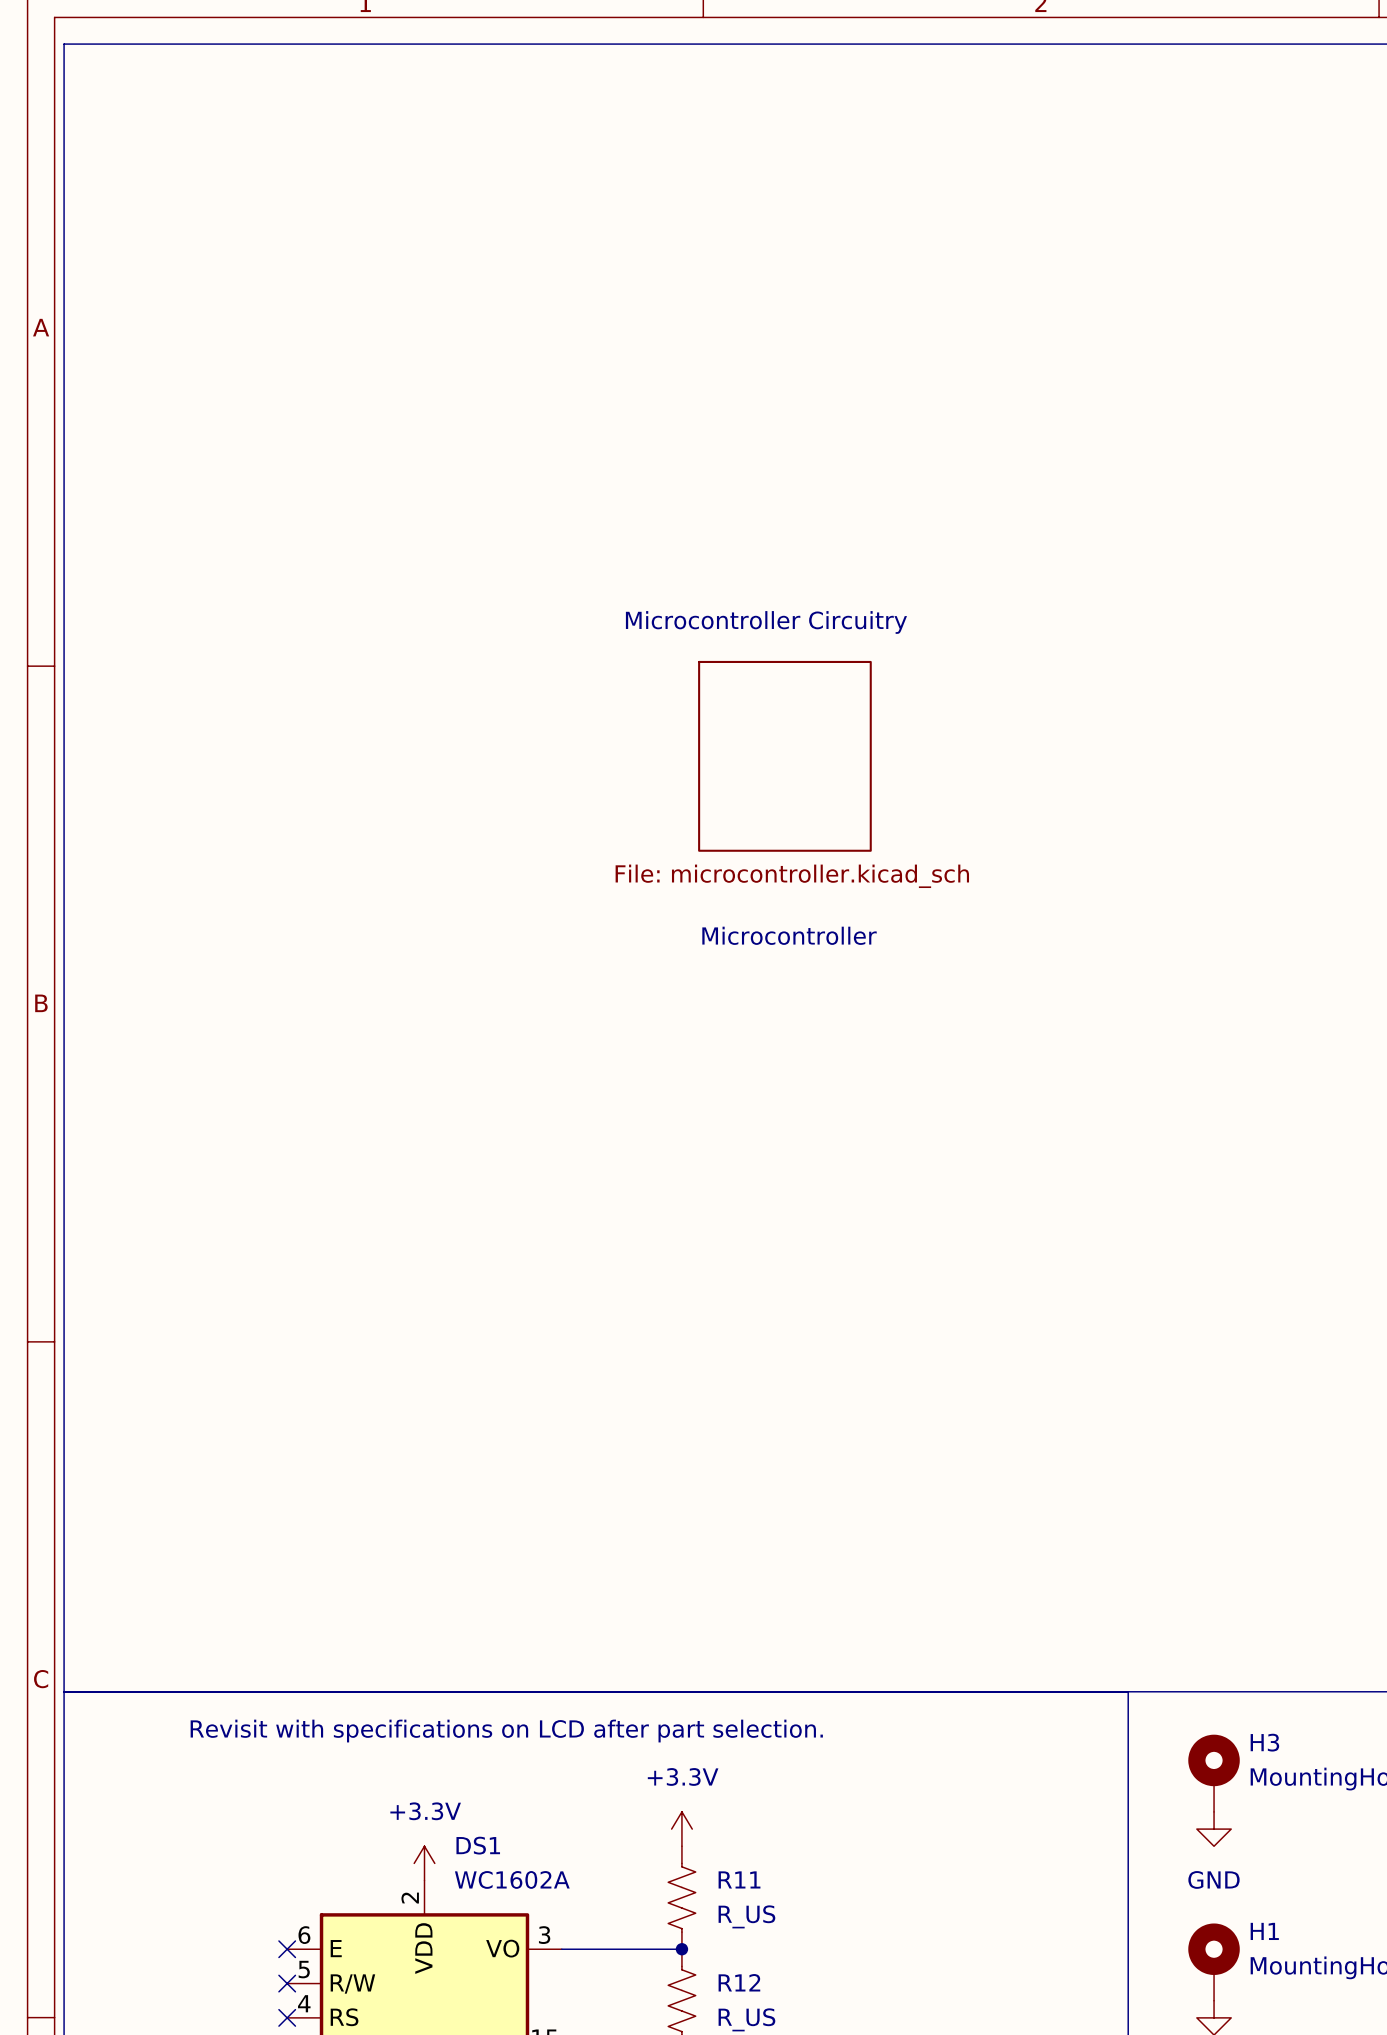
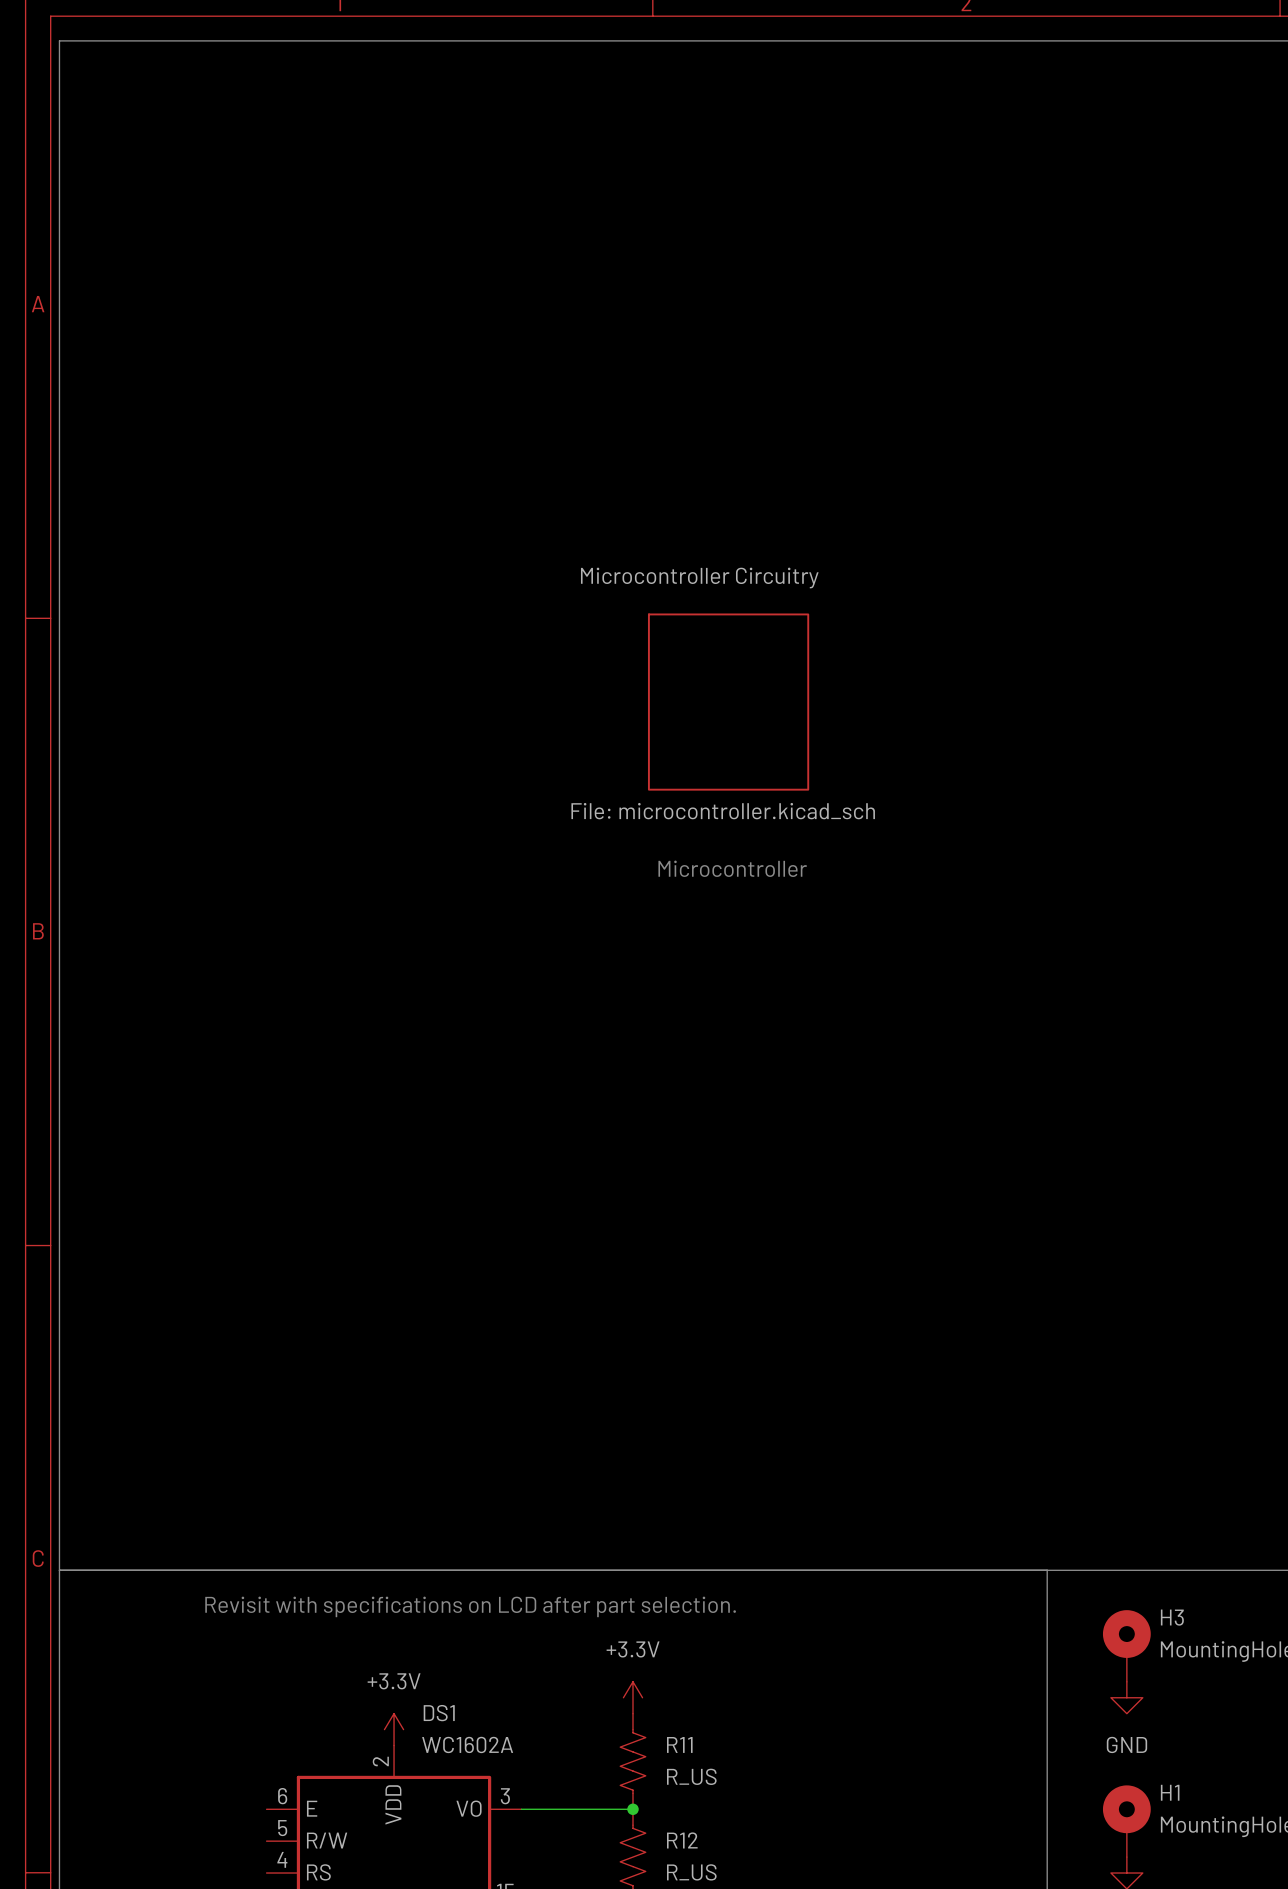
no-connect mark: (287, 1949) -> none
no-connect mark: (287, 1983) -> none
no-connect mark: (287, 2017) -> none

